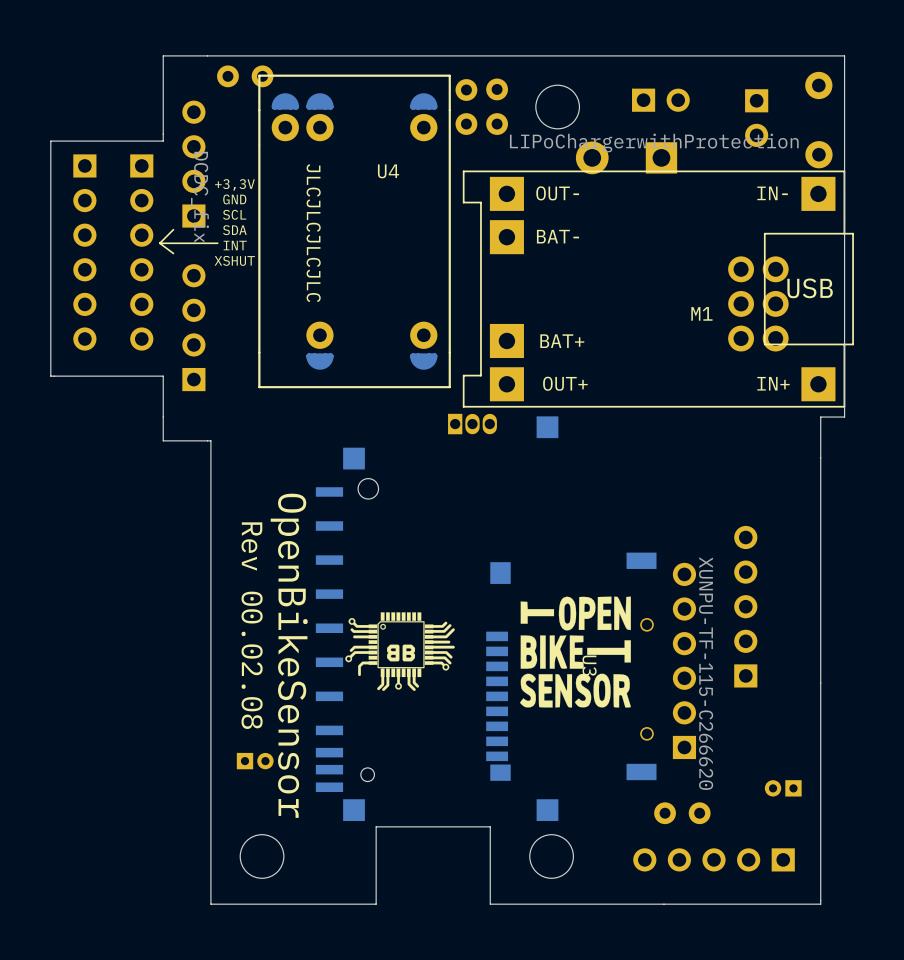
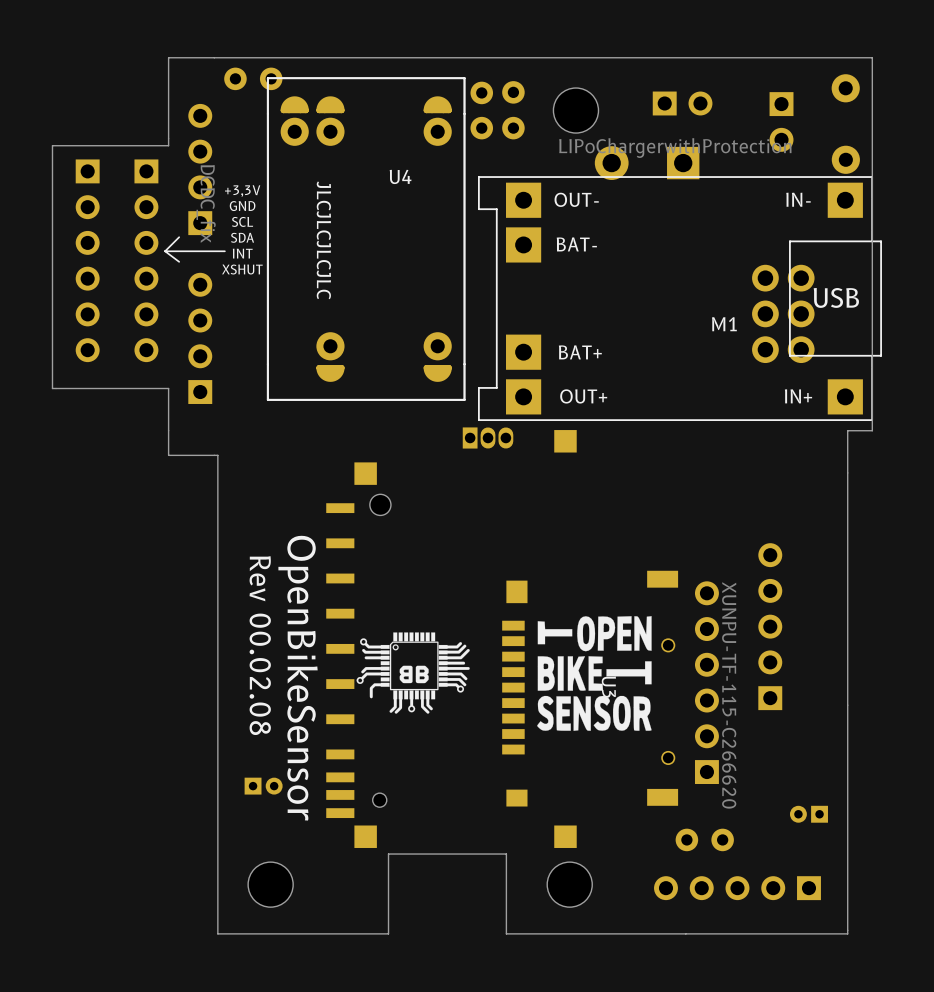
U3 footprint: [486, 552, 657, 781] -> [502, 570, 679, 807]

